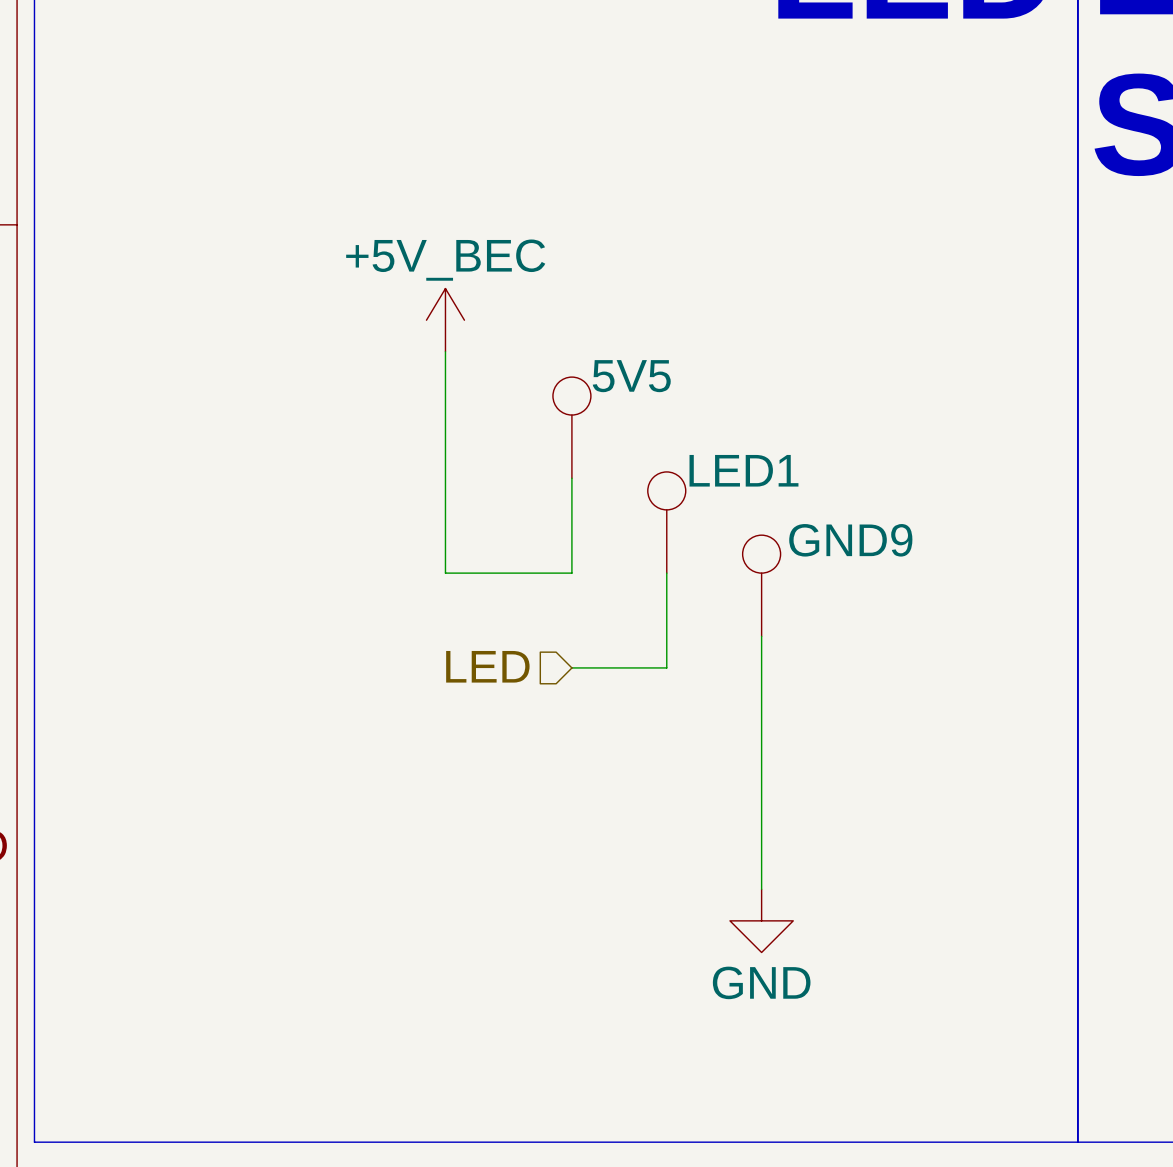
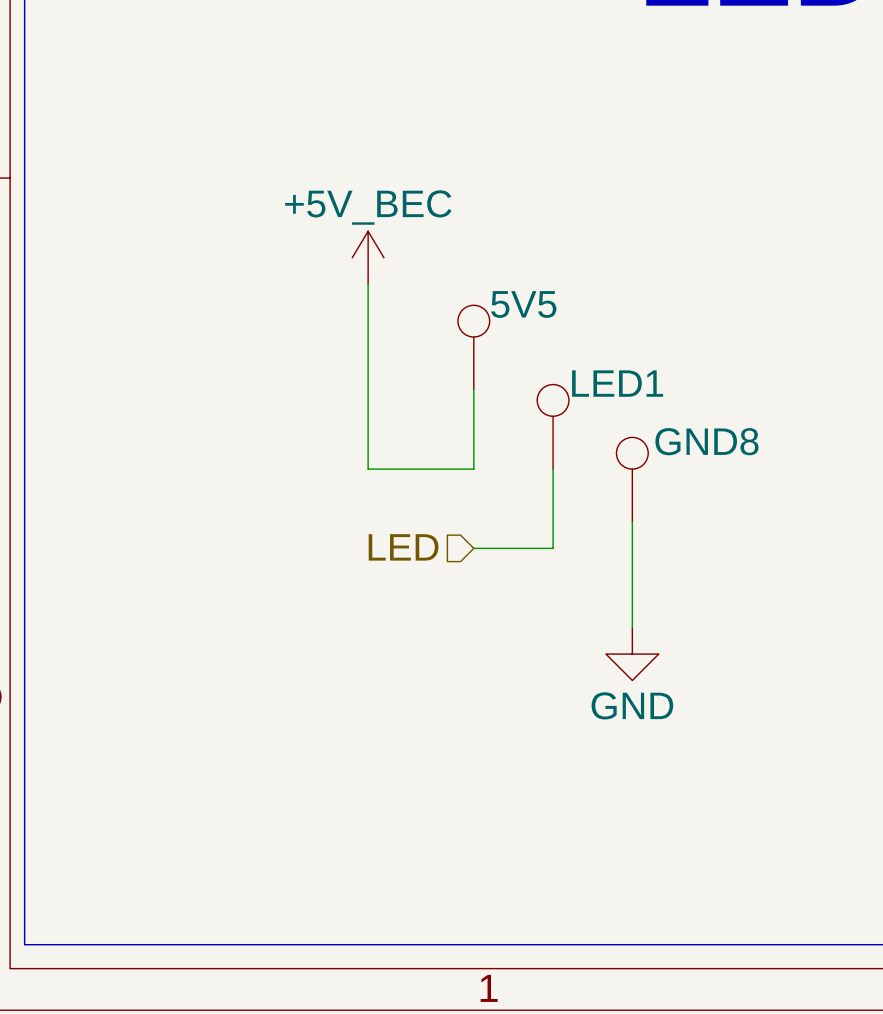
GND9 name: GND9 (850, 540) -> GND8 (706, 441)
wire: (761, 762) (761, 889) -> none
power symbol position: GND (761, 920) -> GND (632, 654)

